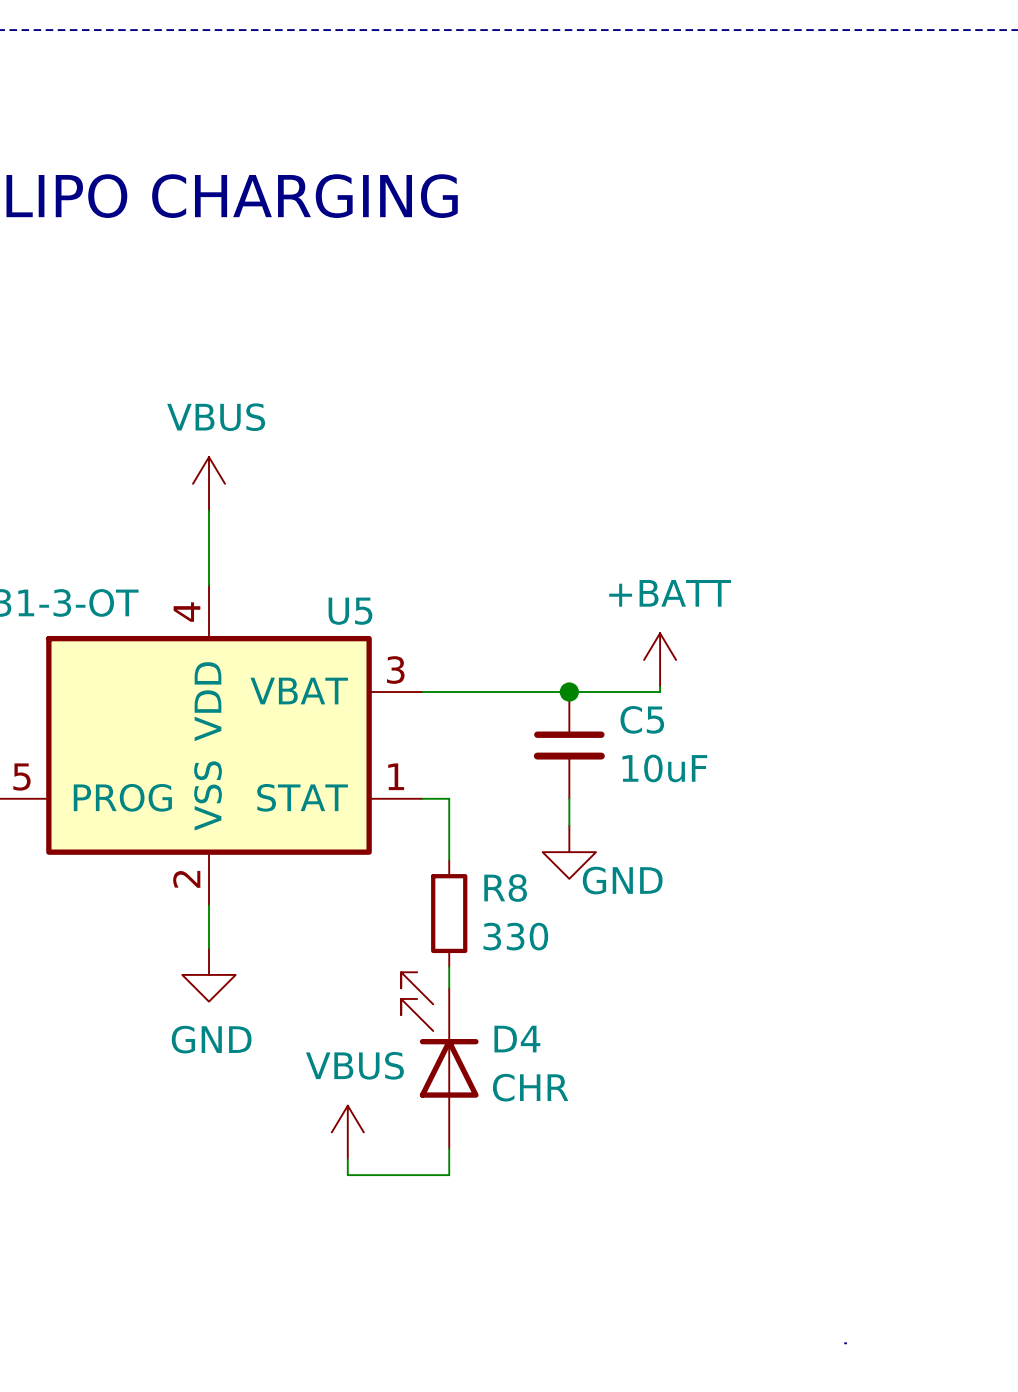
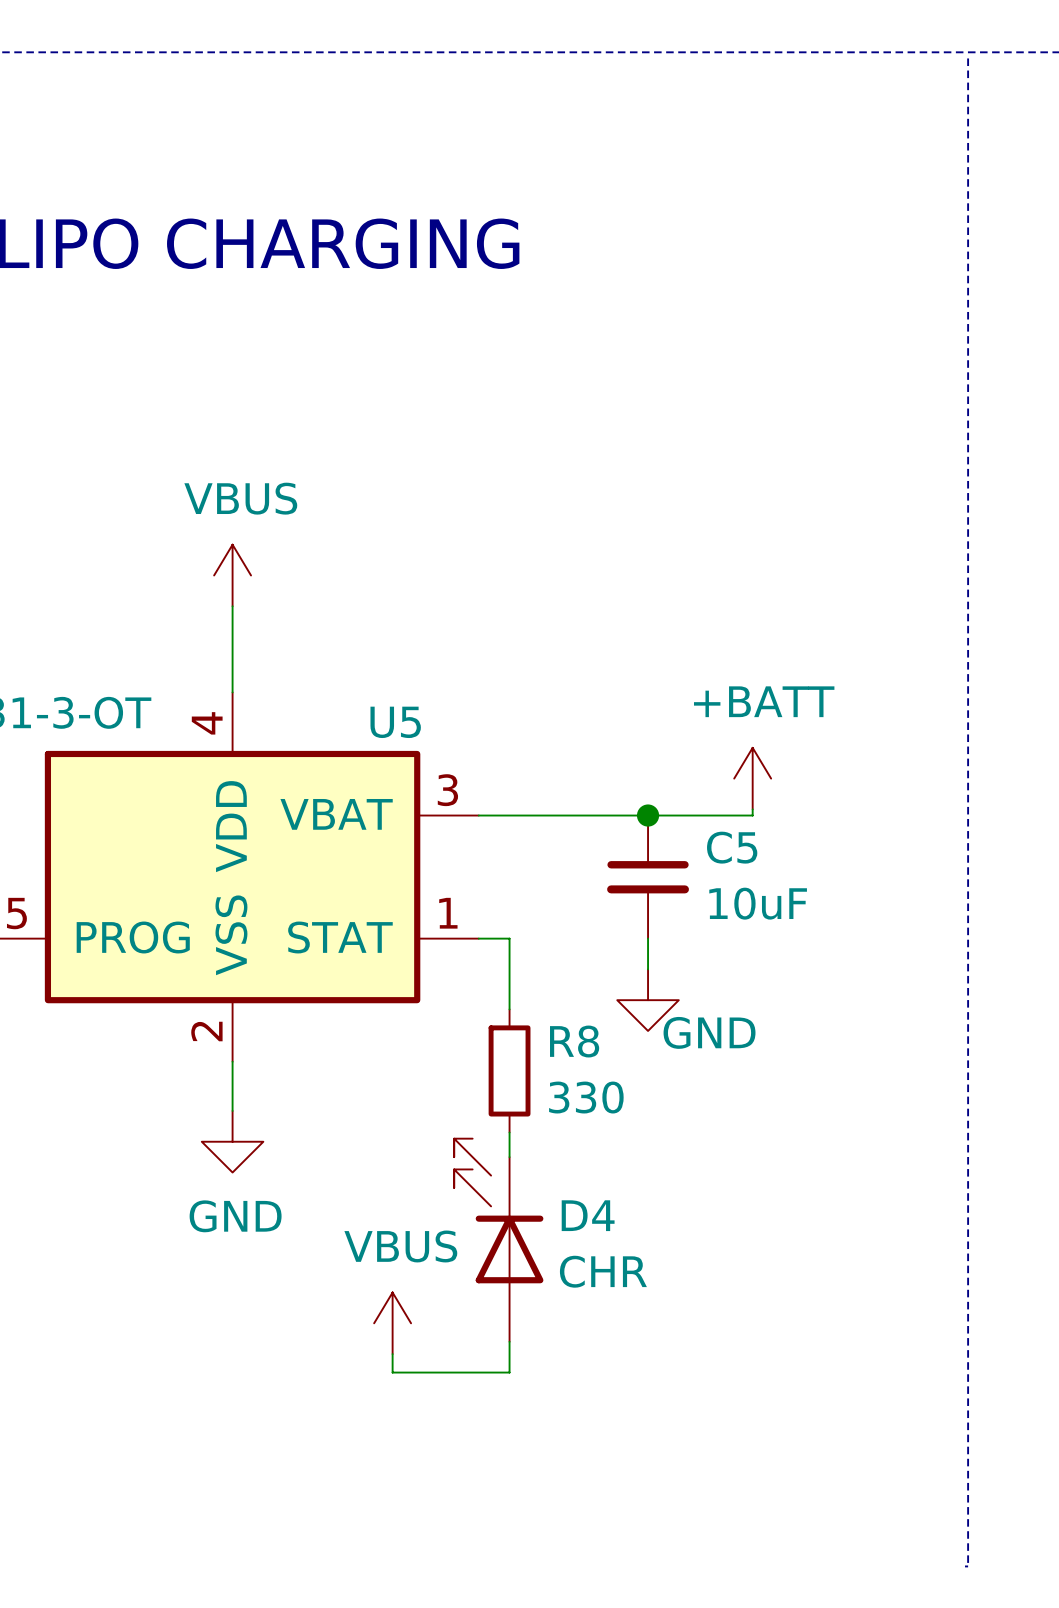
line: none -> (968, 58) (968, 1566)

